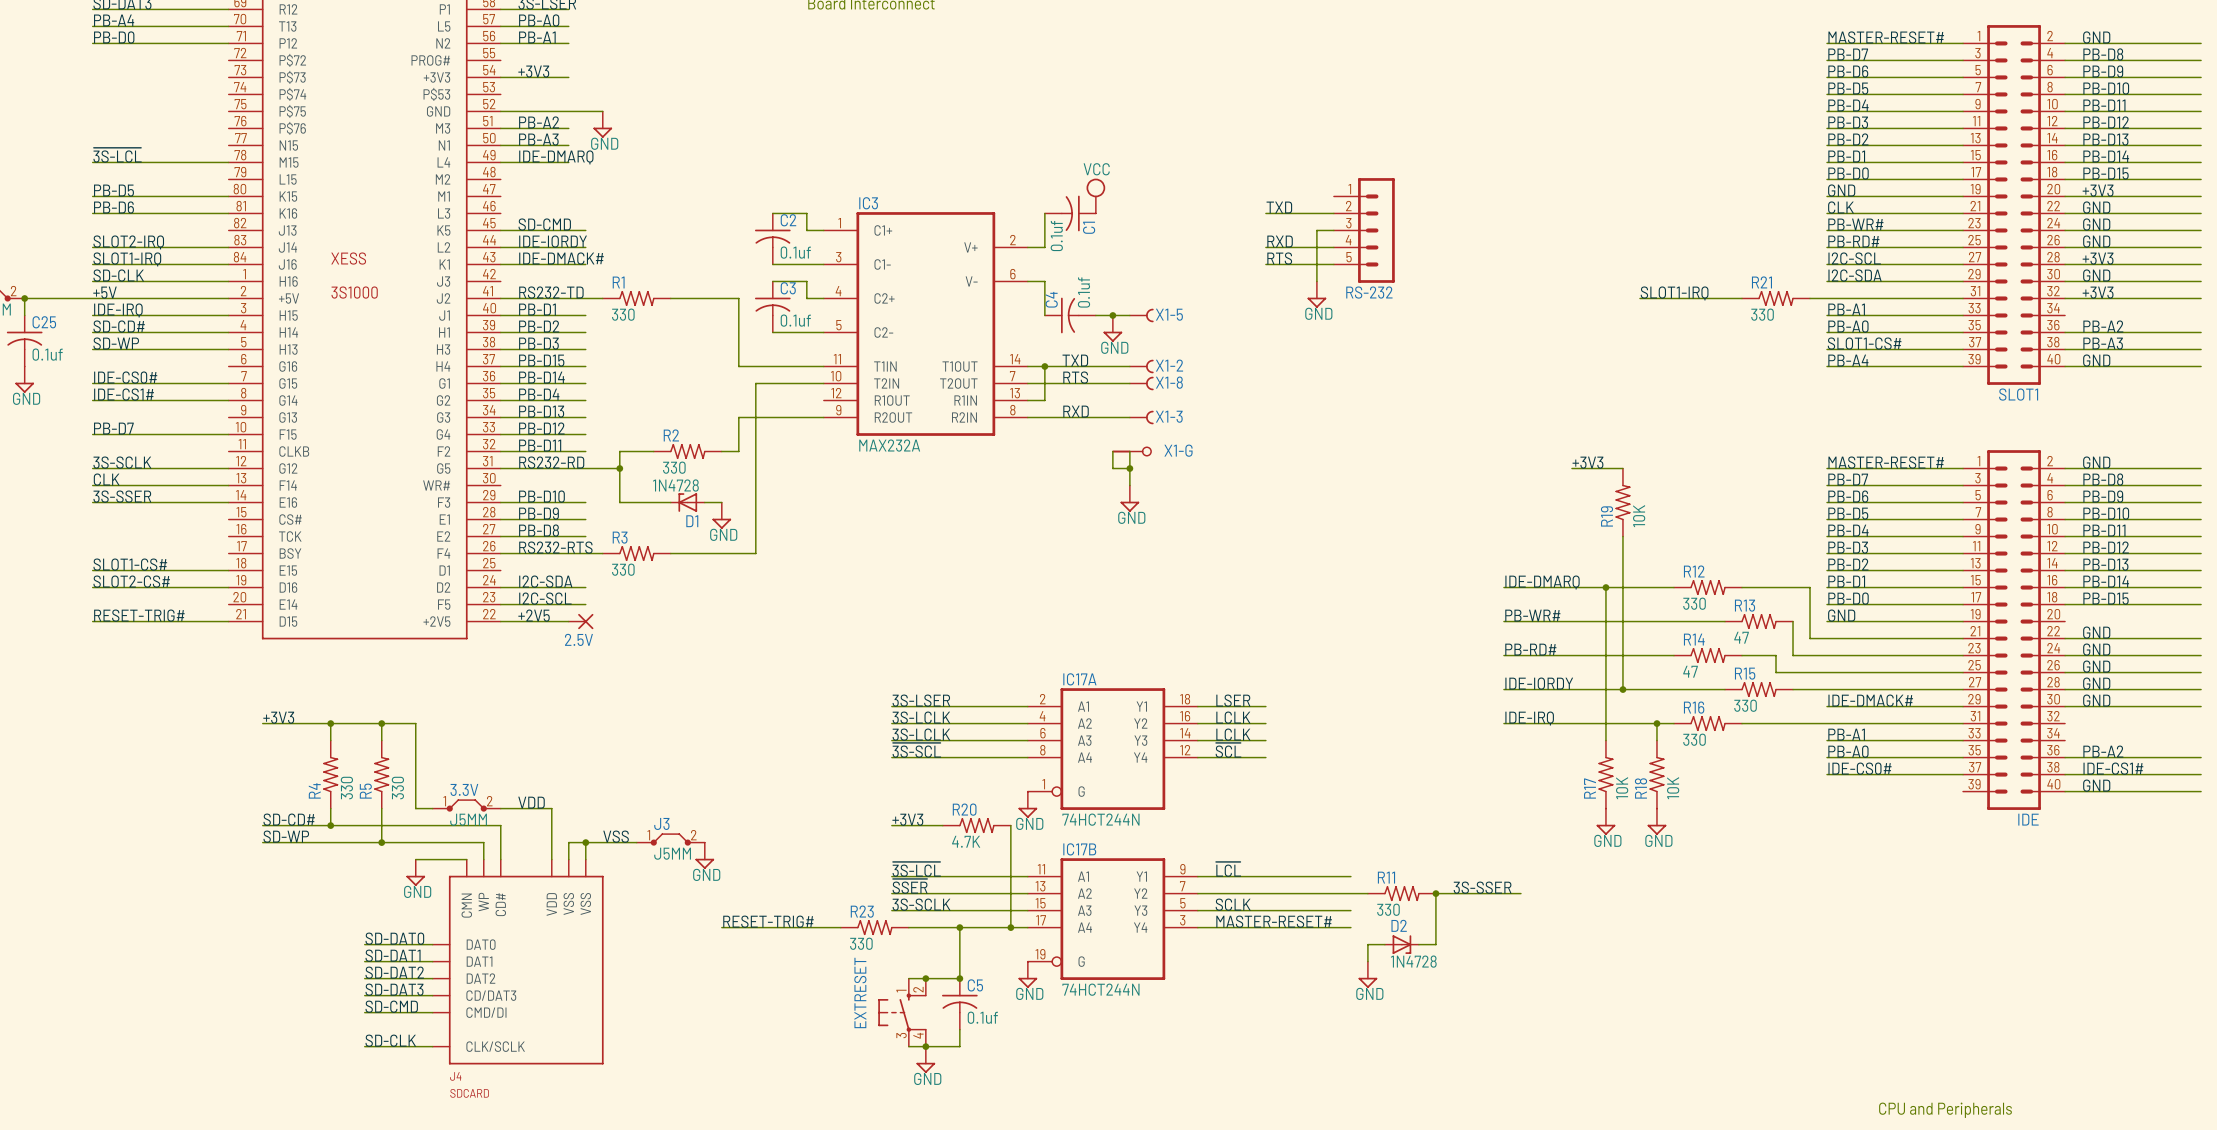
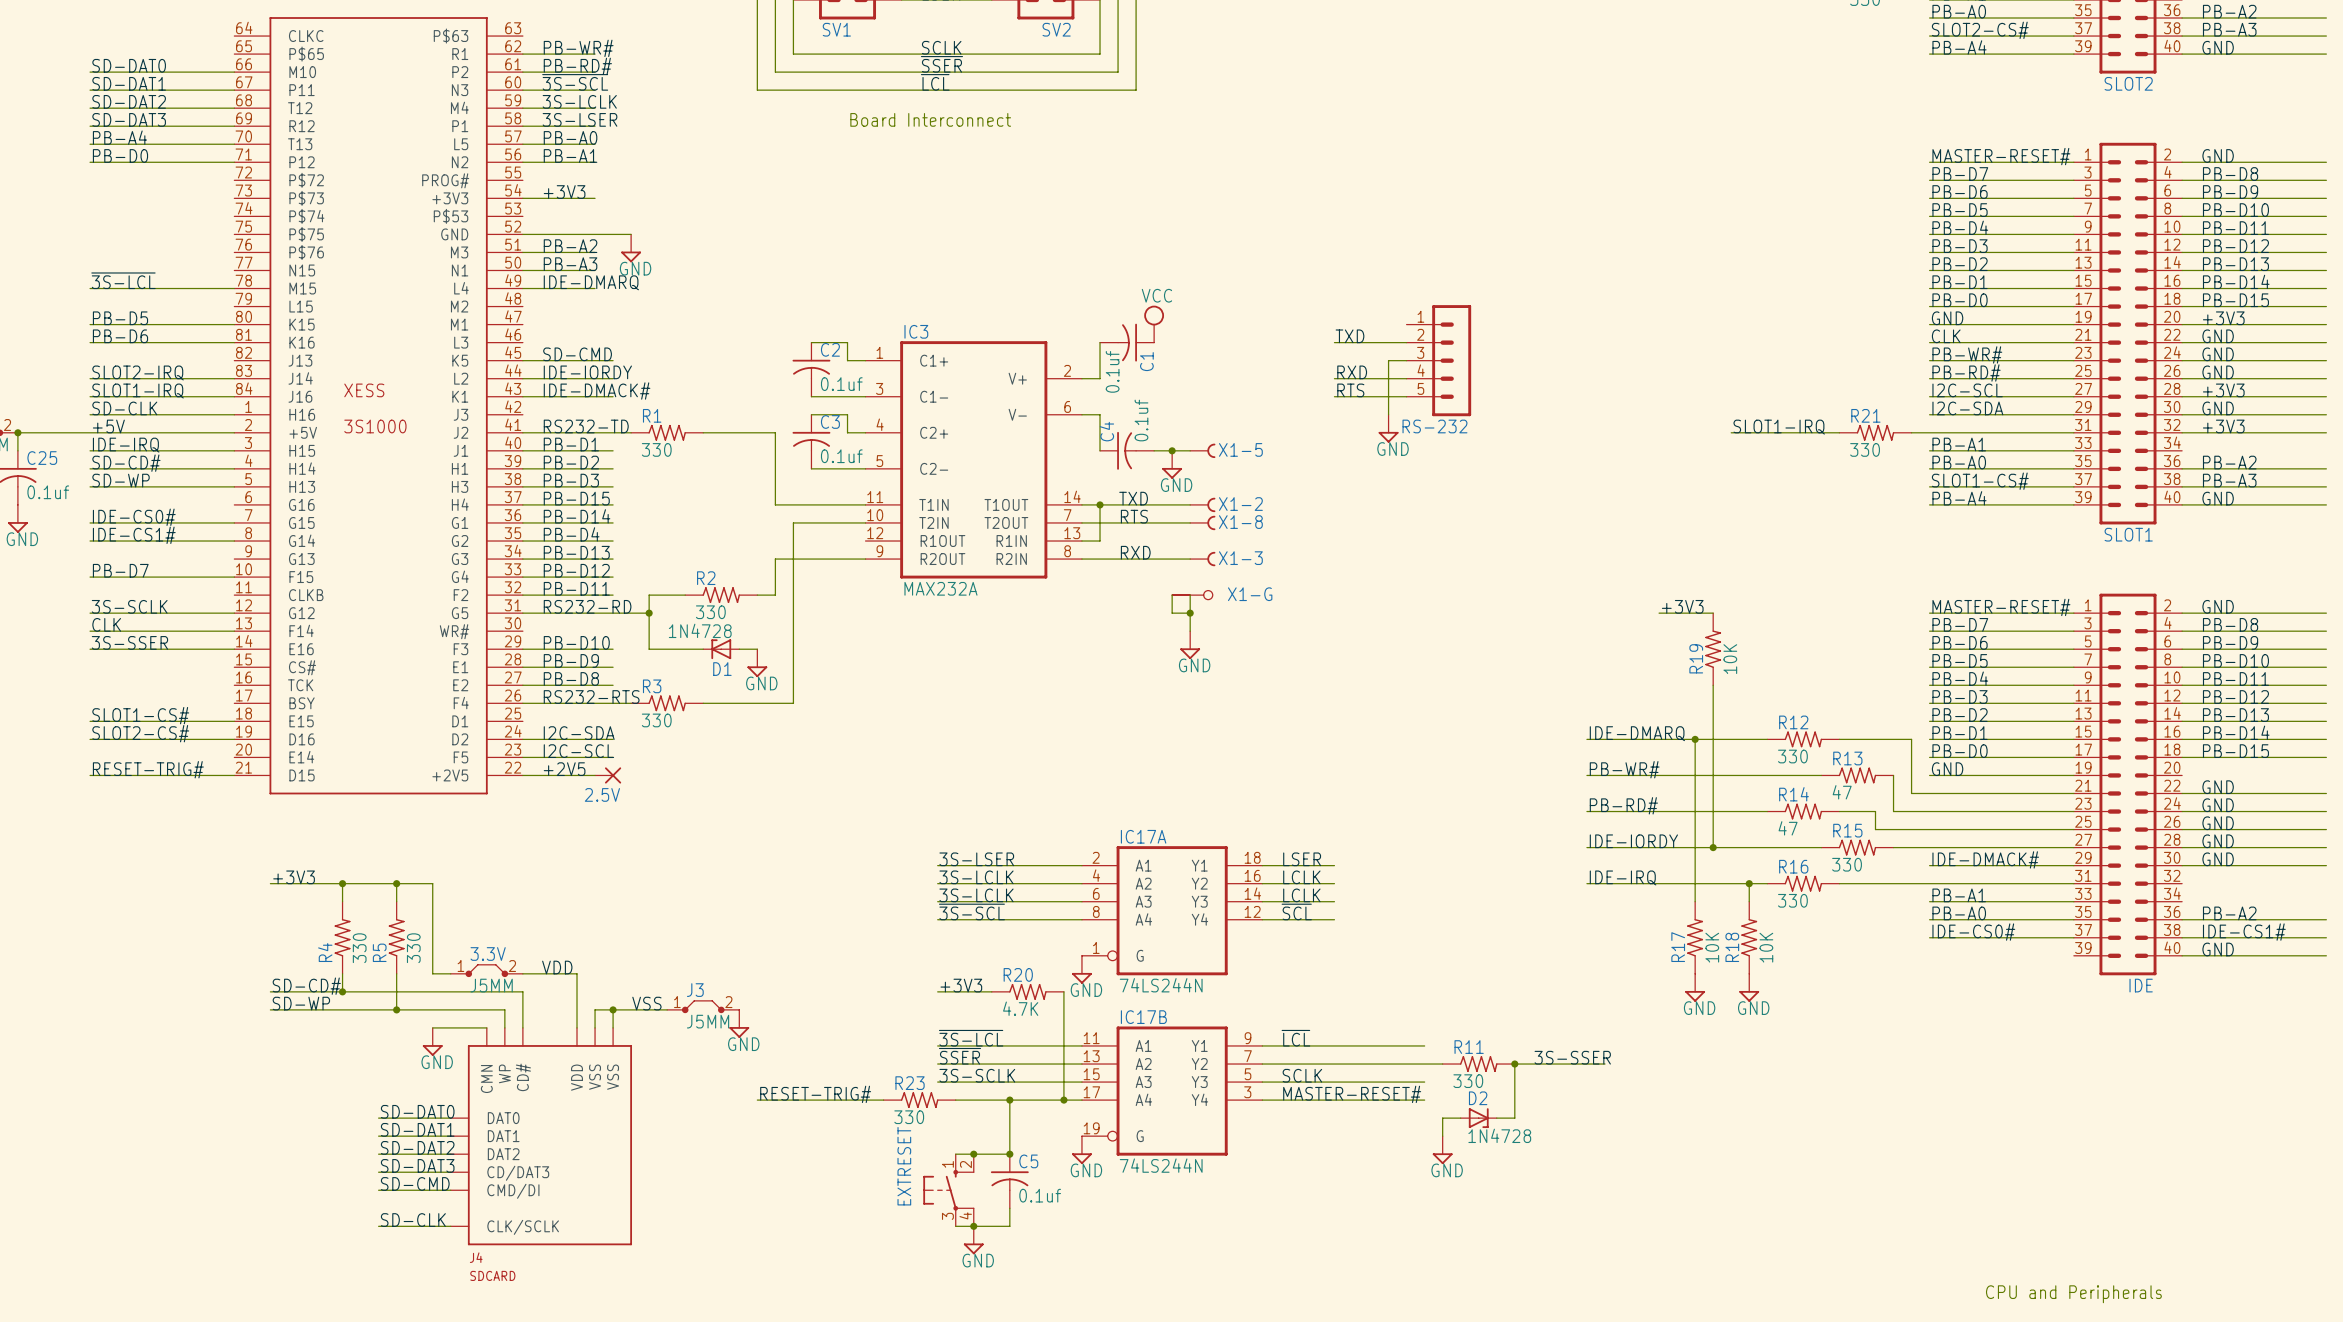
IC17A value: 74HCT244N (1100, 819) -> 74LS244N (1161, 985)
IC17B value: 74HCT244N (1100, 989) -> 74LS244N (1161, 1165)

